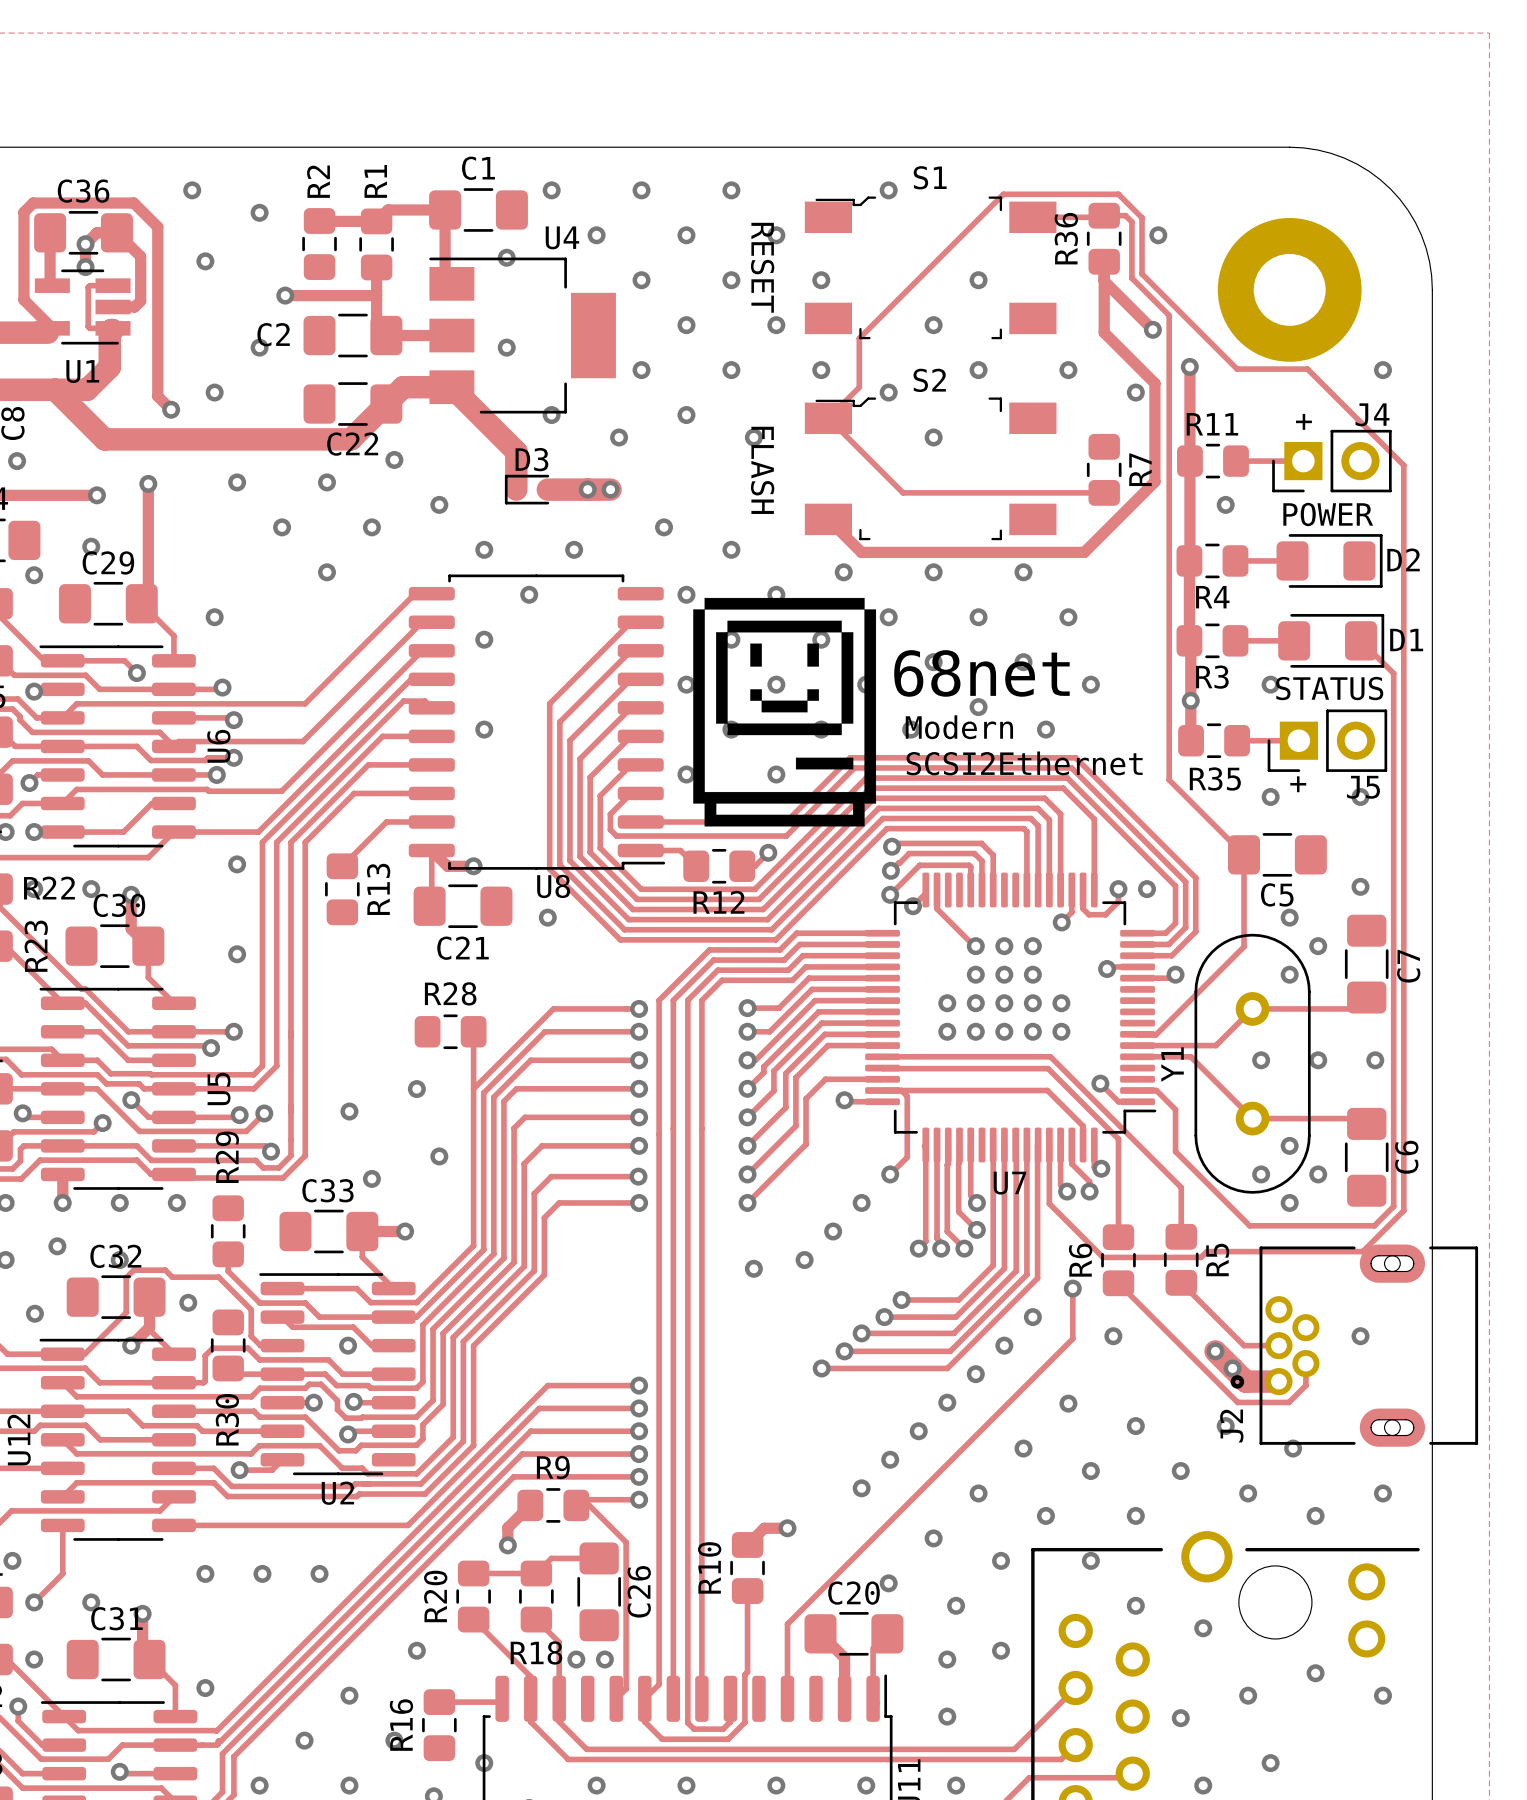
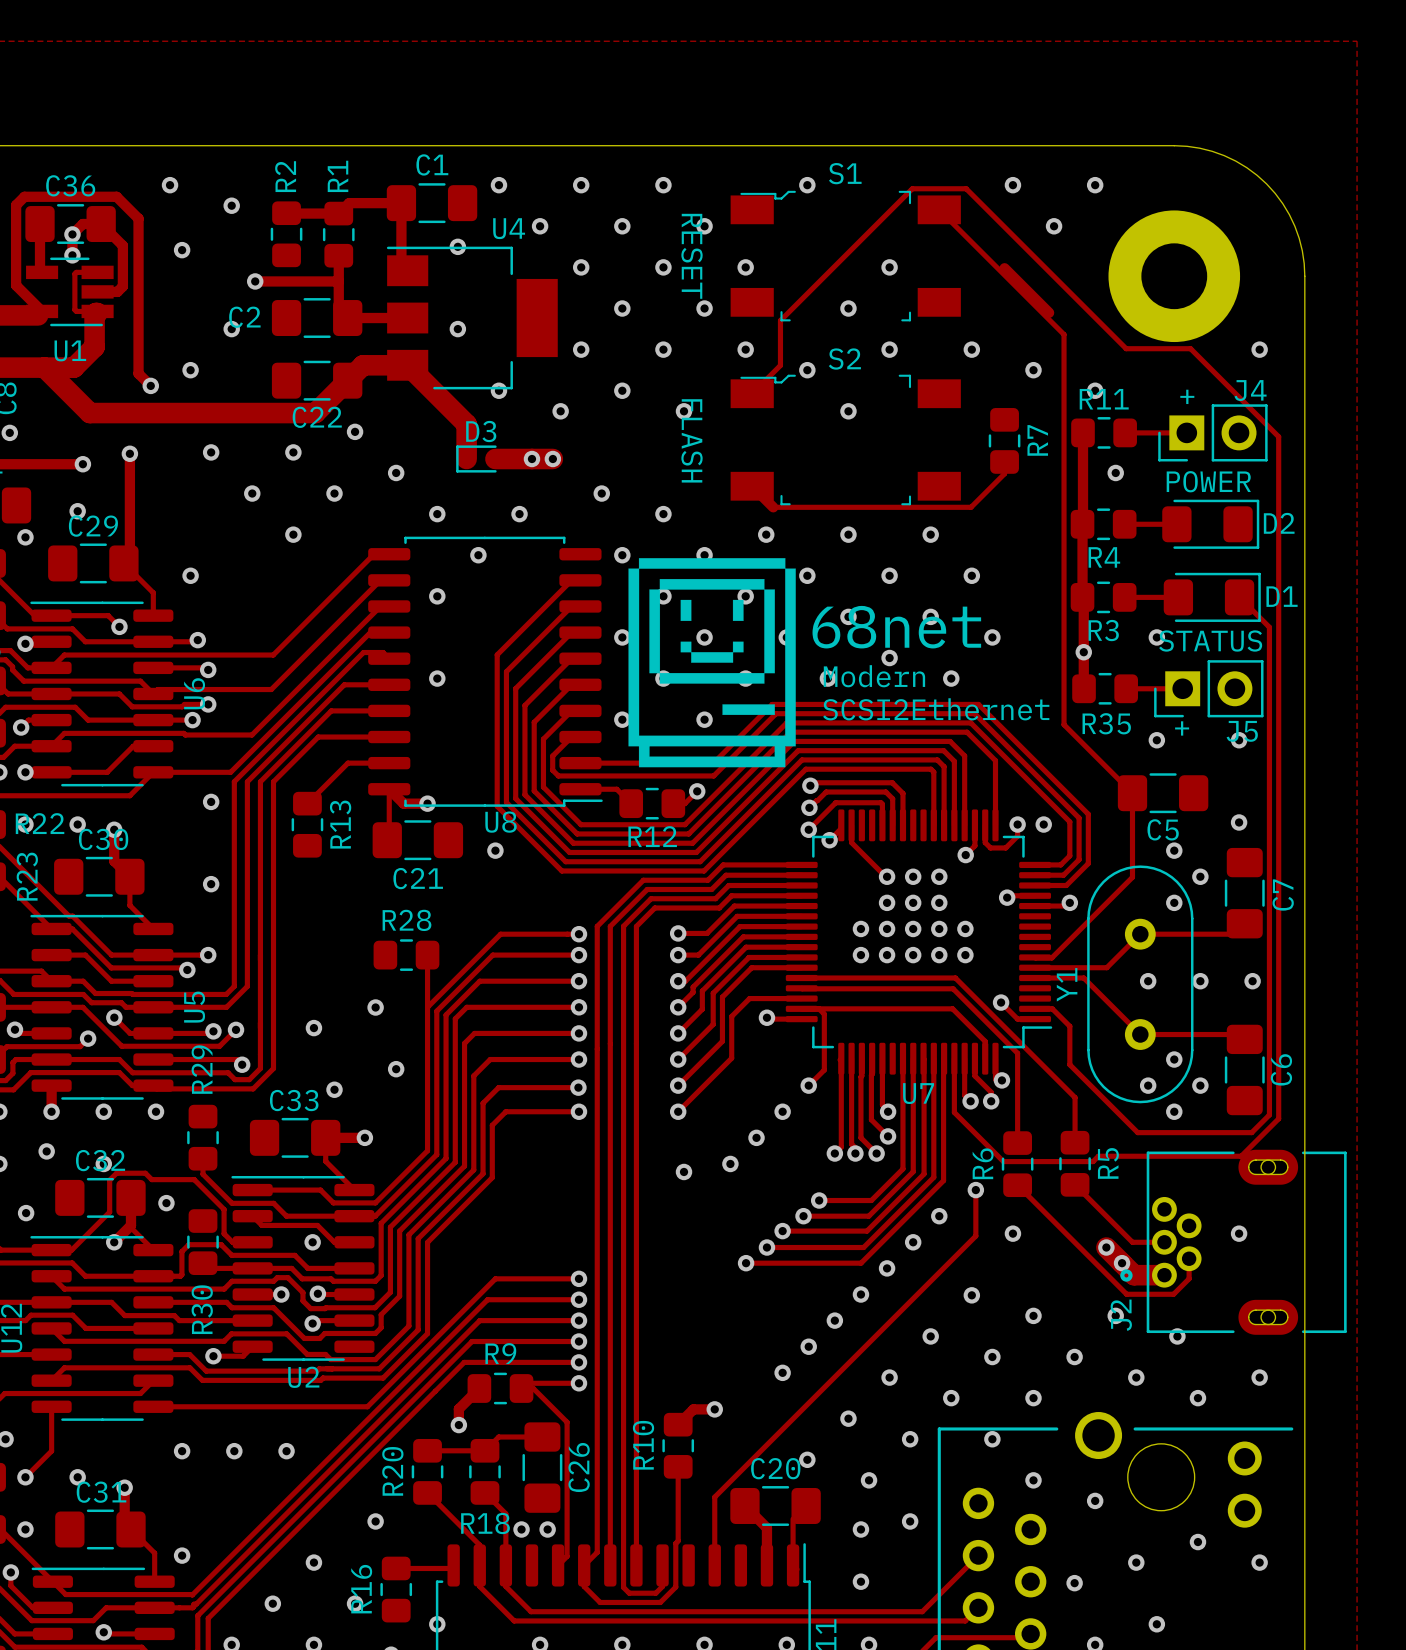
via: none -> (1012, 185)
via: none -> (1095, 185)
track: (1062, 194) (1118, 194) (1142, 217) (1142, 273) -> (966, 188) (1039, 261)
track: (1032, 217) (1125, 215) (1131, 222) (1131, 278) (1169, 315) (1169, 353) -> (939, 209) (1064, 334)
R36: (1104, 238) -> none
track: (1104, 261) (1104, 332) (1154, 383) (1154, 481) (1084, 552) (861, 552) (851, 542) -> none
via: (1152, 329) -> none
via: (1189, 366) -> none
track: (1189, 367) (1189, 461) -> none
via: none -> (1095, 390)
track: (828, 418) (903, 492) (1104, 492) -> (773, 507) (971, 507) (1004, 473) (1004, 461)

